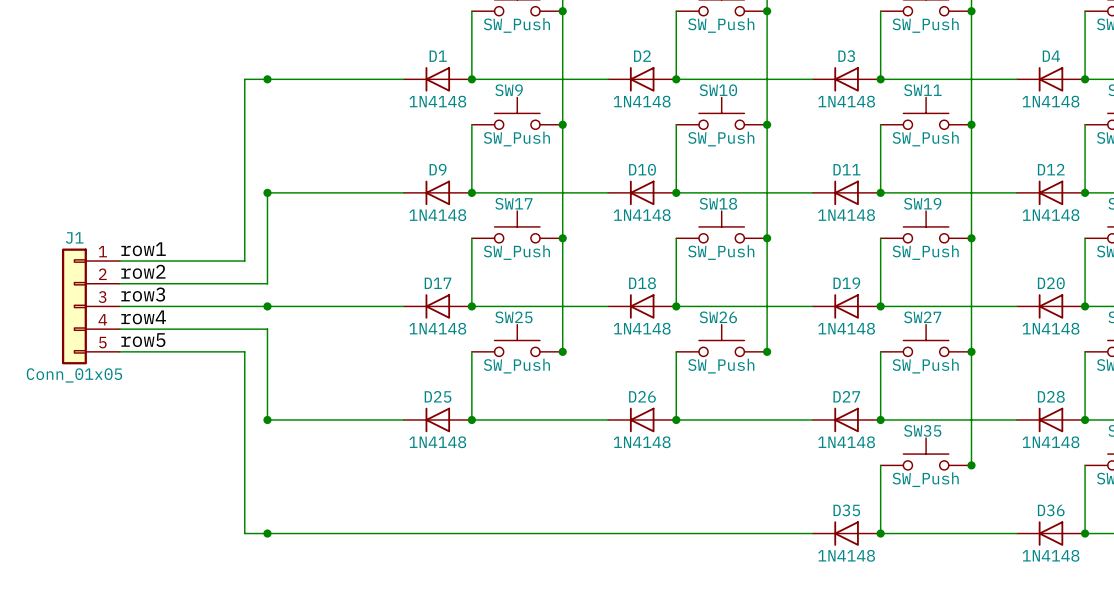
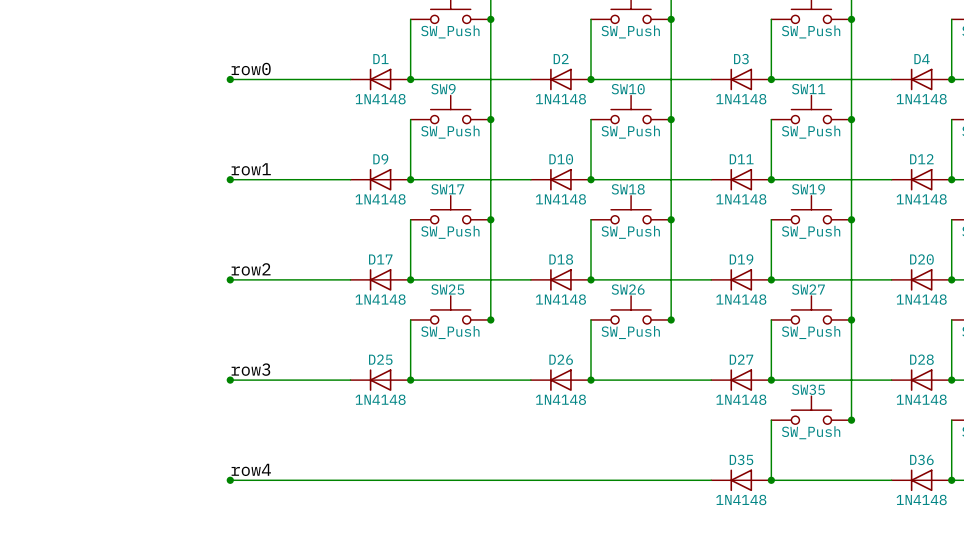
label: none -> row0 (251, 69)
wire: (267, 79) (244, 79) (244, 261) (119, 261) -> none
wire: (267, 192) (267, 283) (119, 283) -> none
label position: row1 (143, 249) -> row1 (251, 169)
label position: row2 (143, 271) -> row2 (251, 269)
label position: row3 (143, 294) -> row3 (250, 369)
J1: Conn_01x05 (90, 306) -> none
wire: (119, 306) (267, 306) -> none
label: row4 (143, 317) -> none
wire: (119, 329) (267, 329) (267, 419) -> none
label: row5 (143, 340) -> none
wire: (119, 351) (244, 351) (244, 533) (267, 533) -> none
label: none -> row4 (251, 469)

